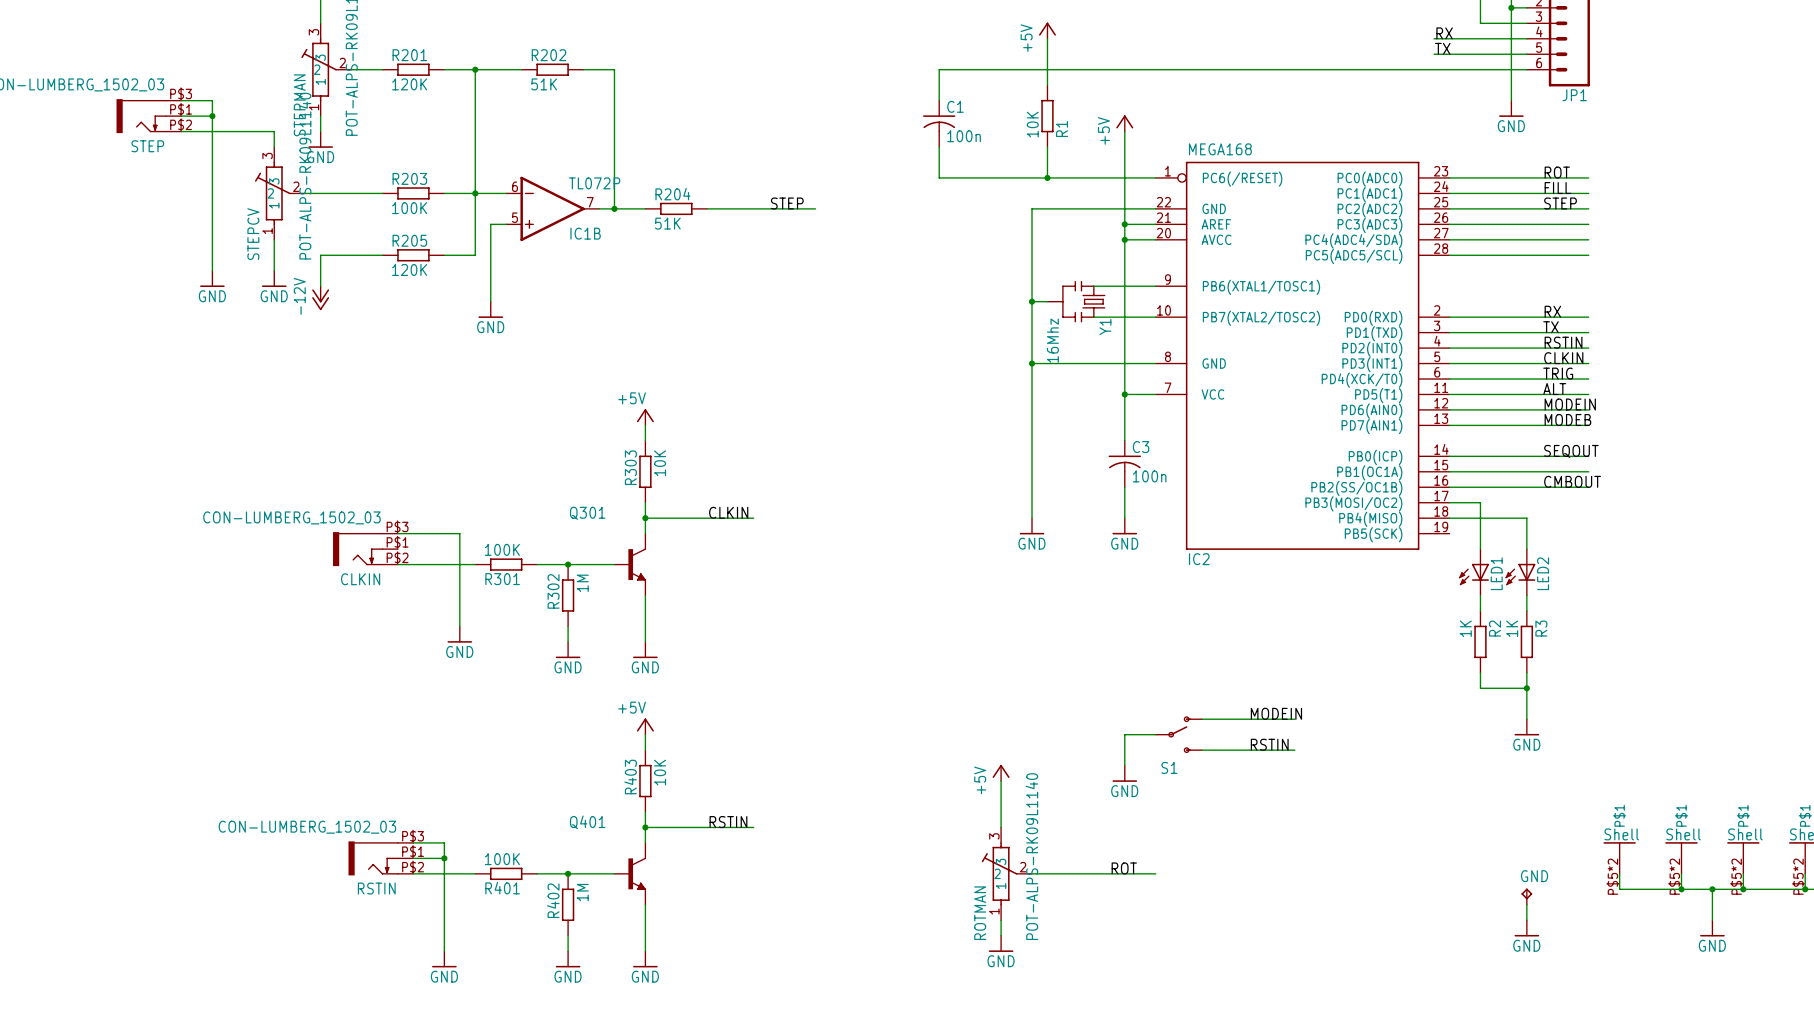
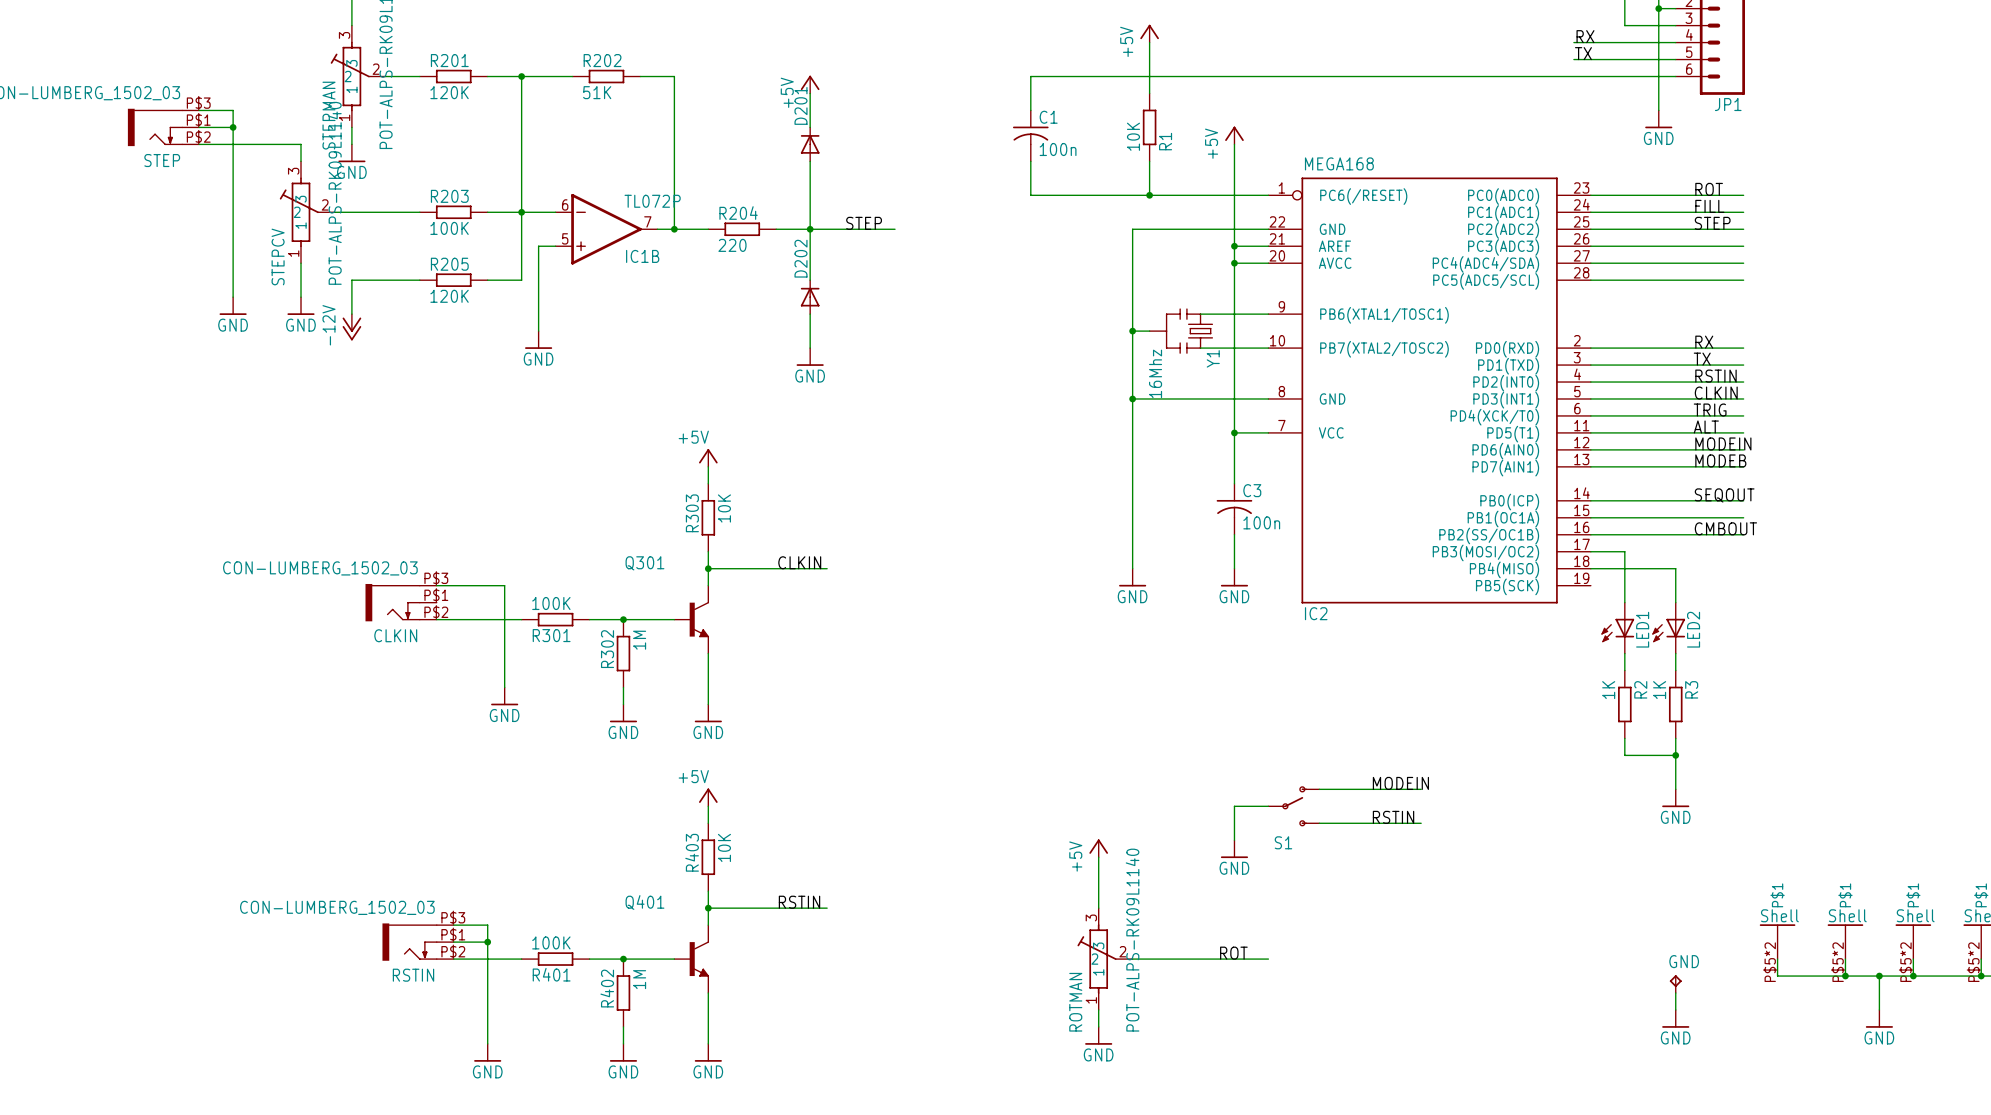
power symbol: none -> +5V (810, 84)
wire: none -> (810, 93) (810, 127)
D201: none -> (810, 144)
wire: none -> (810, 161) (810, 280)
junction: none -> (810, 229)
R204 value: 51K (667, 223) -> 220 (732, 245)
D202: none -> (810, 297)
wire: none -> (810, 314) (810, 348)
power symbol: none -> GND (810, 356)

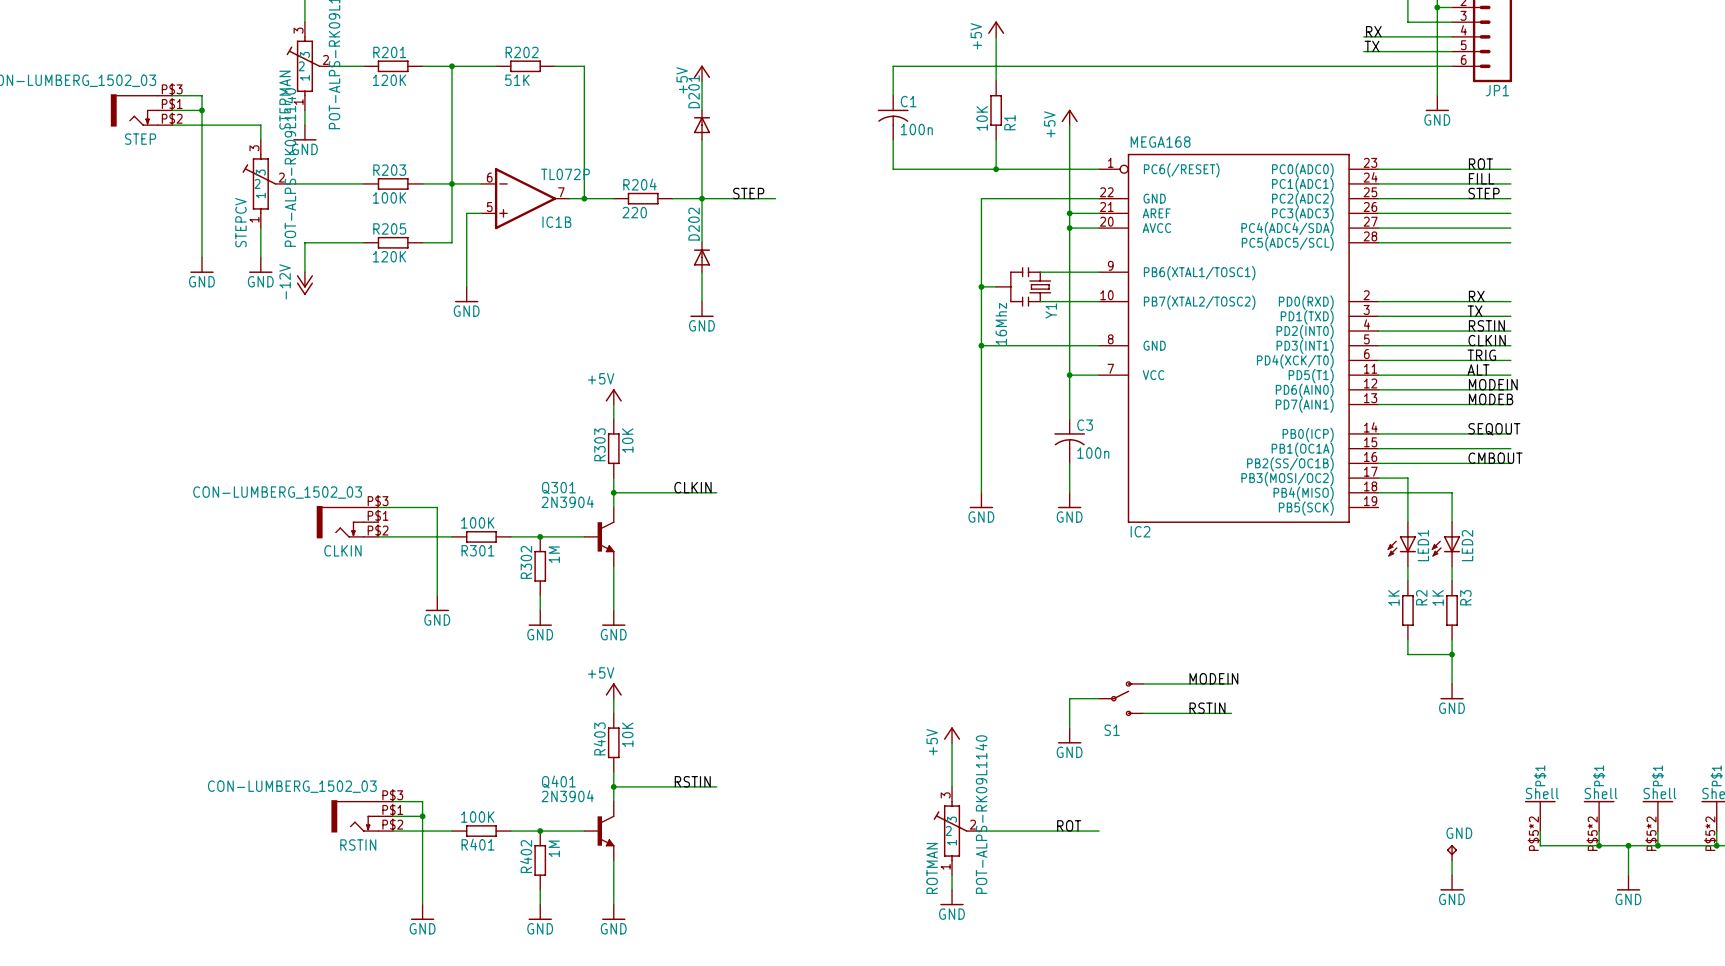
Q301 value: none -> 2N3904 (567, 502)
Q401 value: none -> 2N3904 (567, 796)

